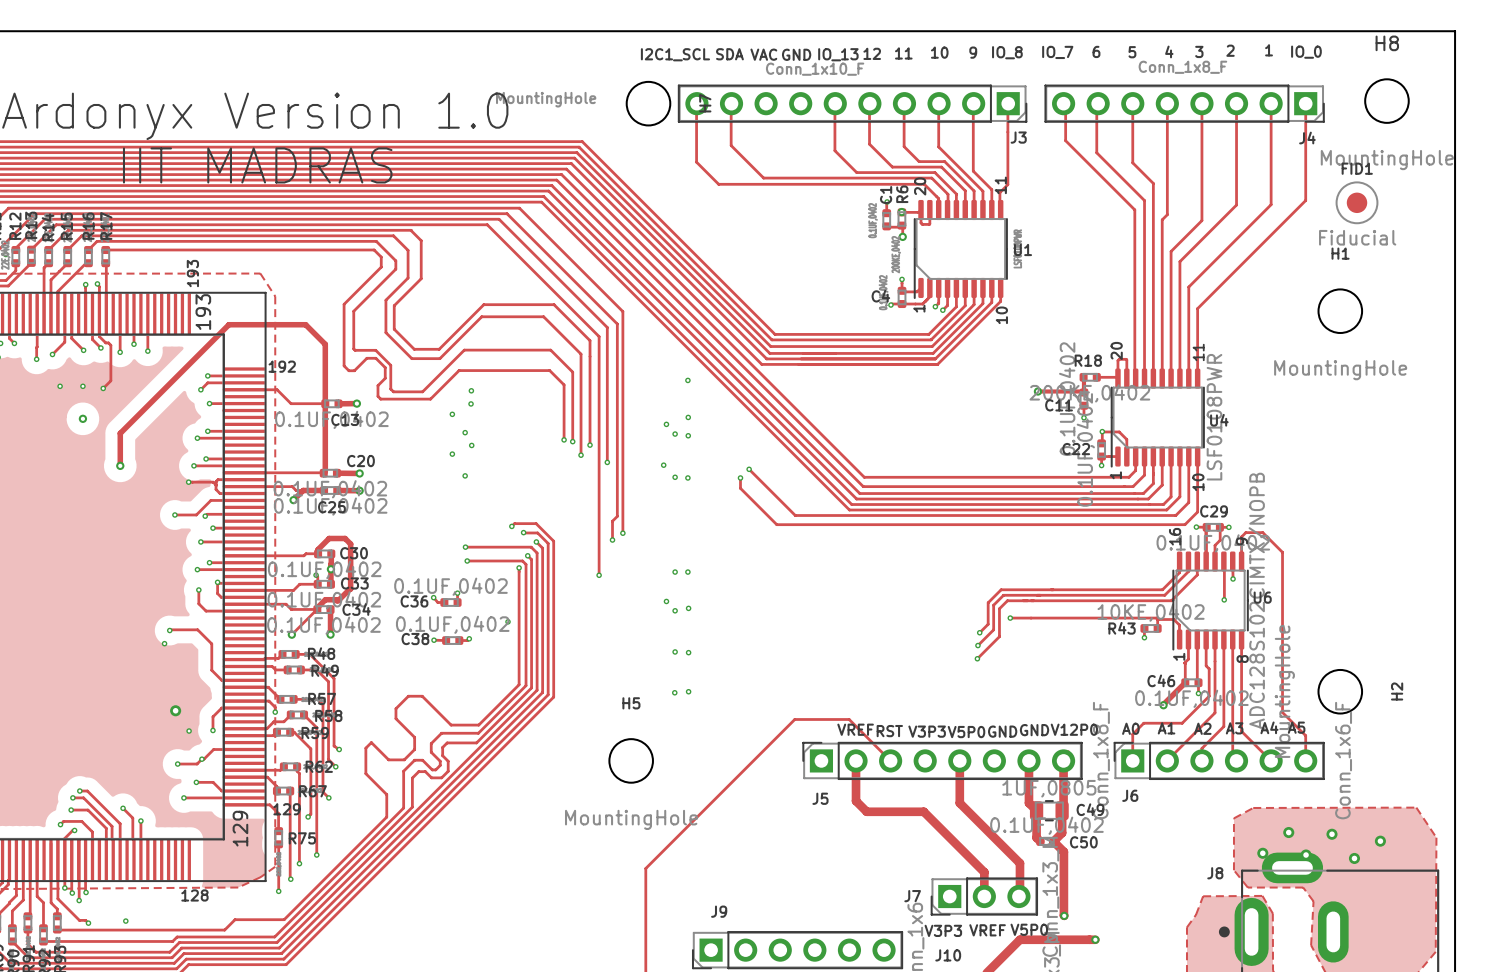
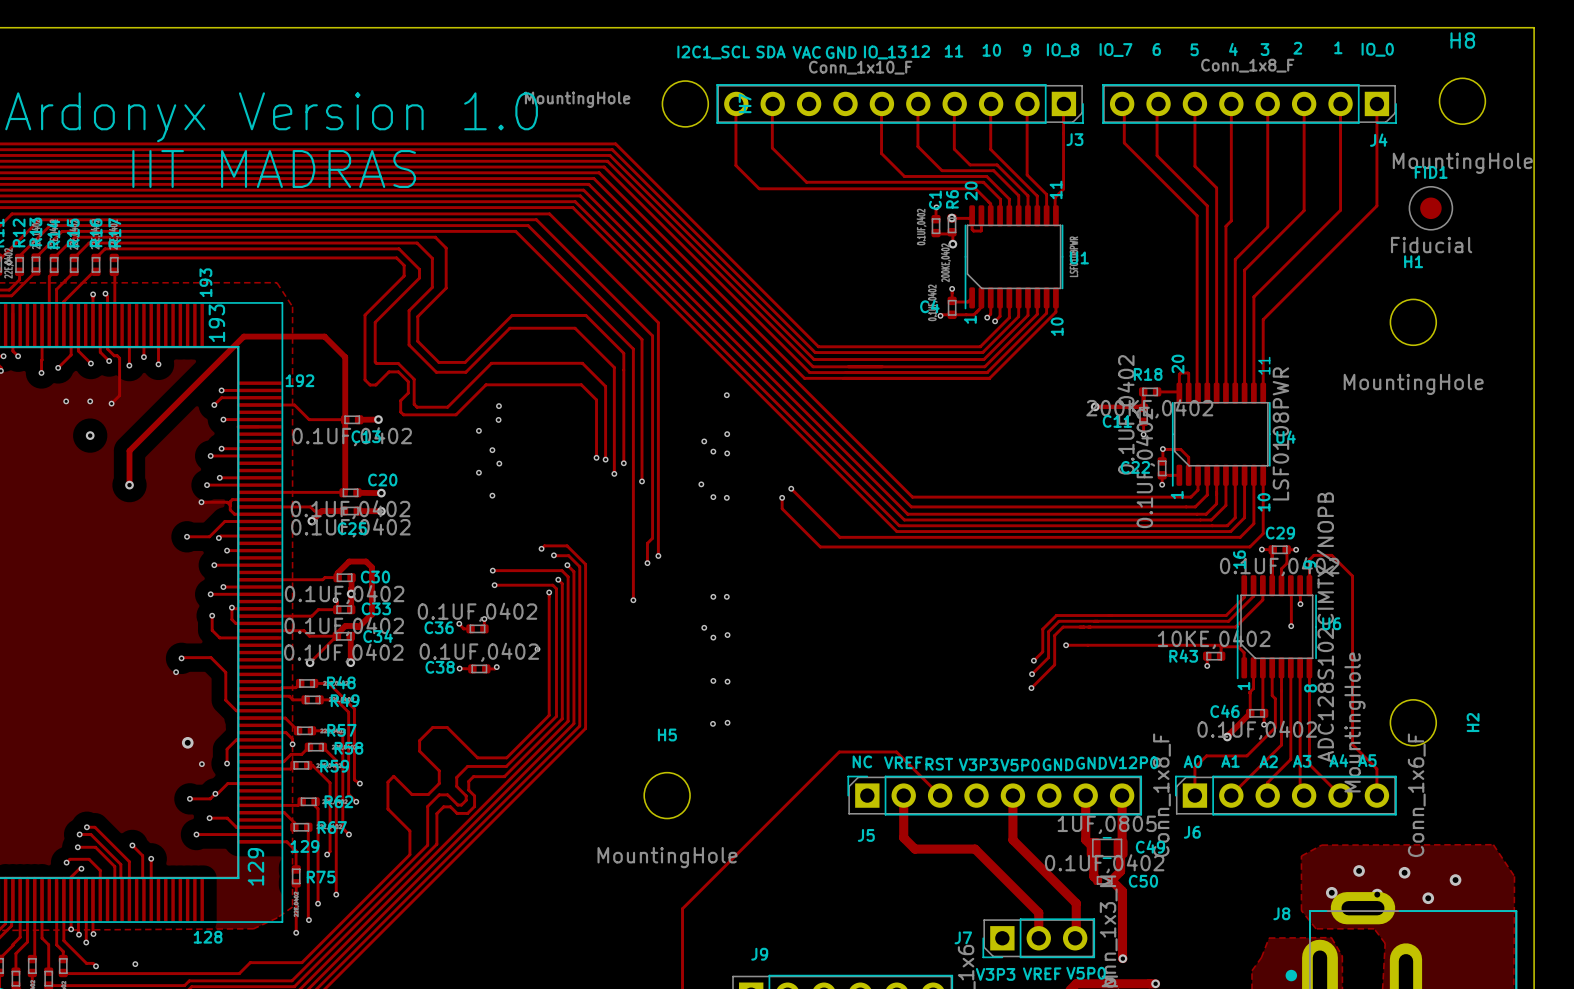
text: none -> NC (862, 761)

